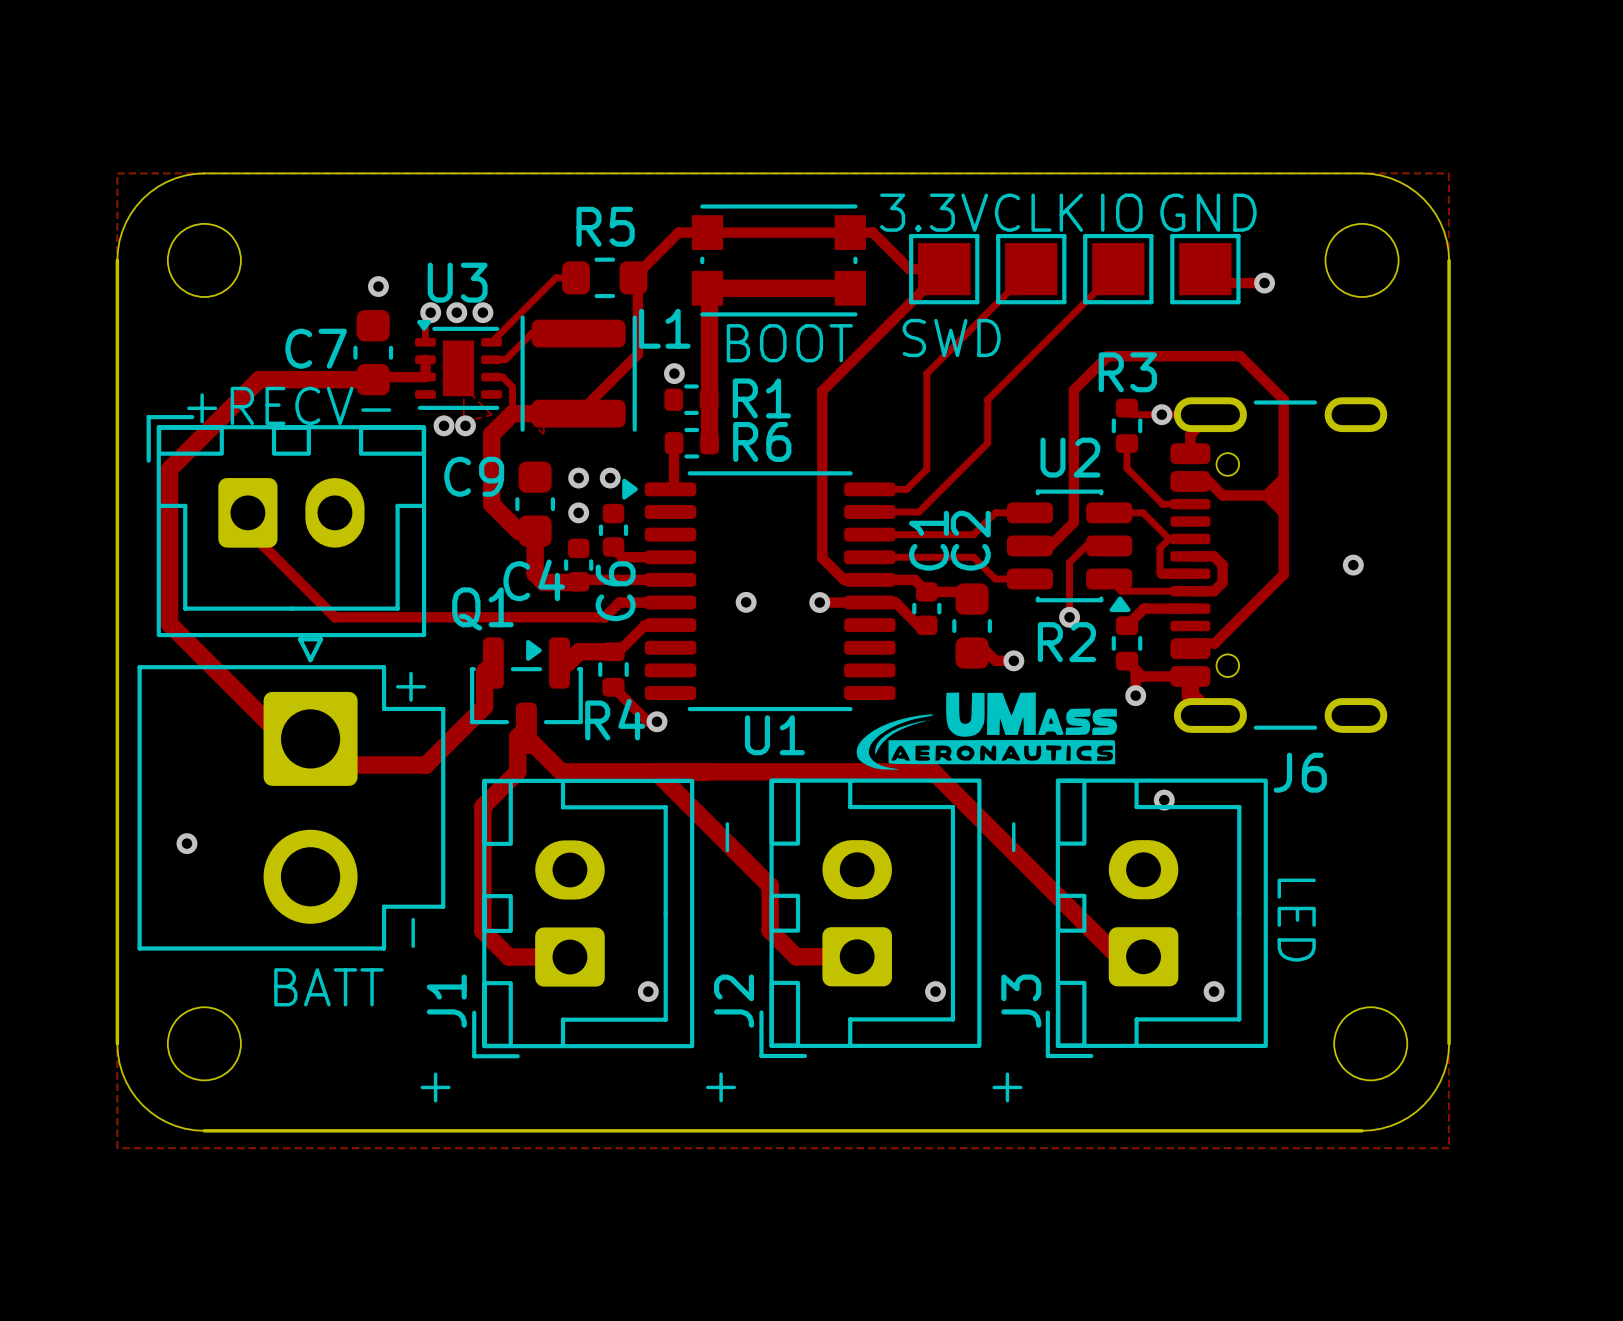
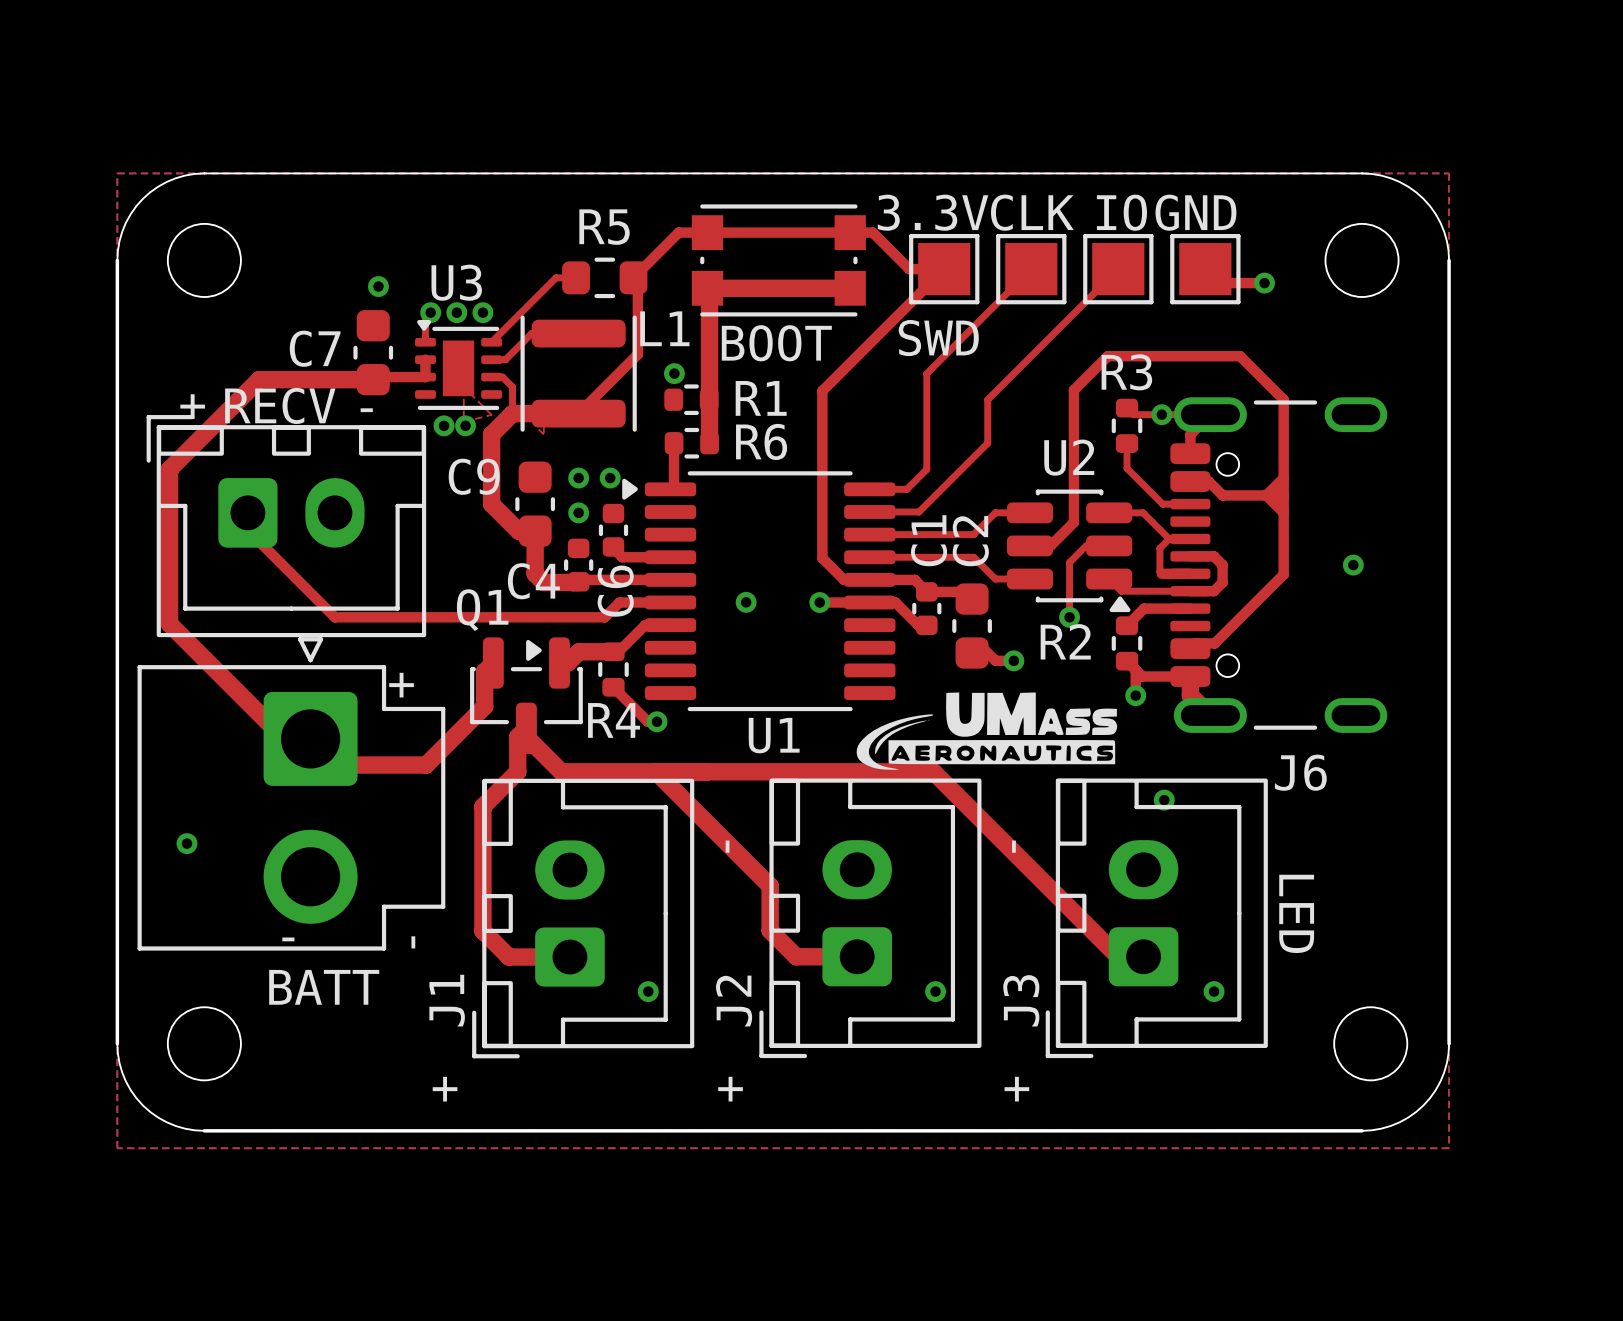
text: none -> - (288, 939)

